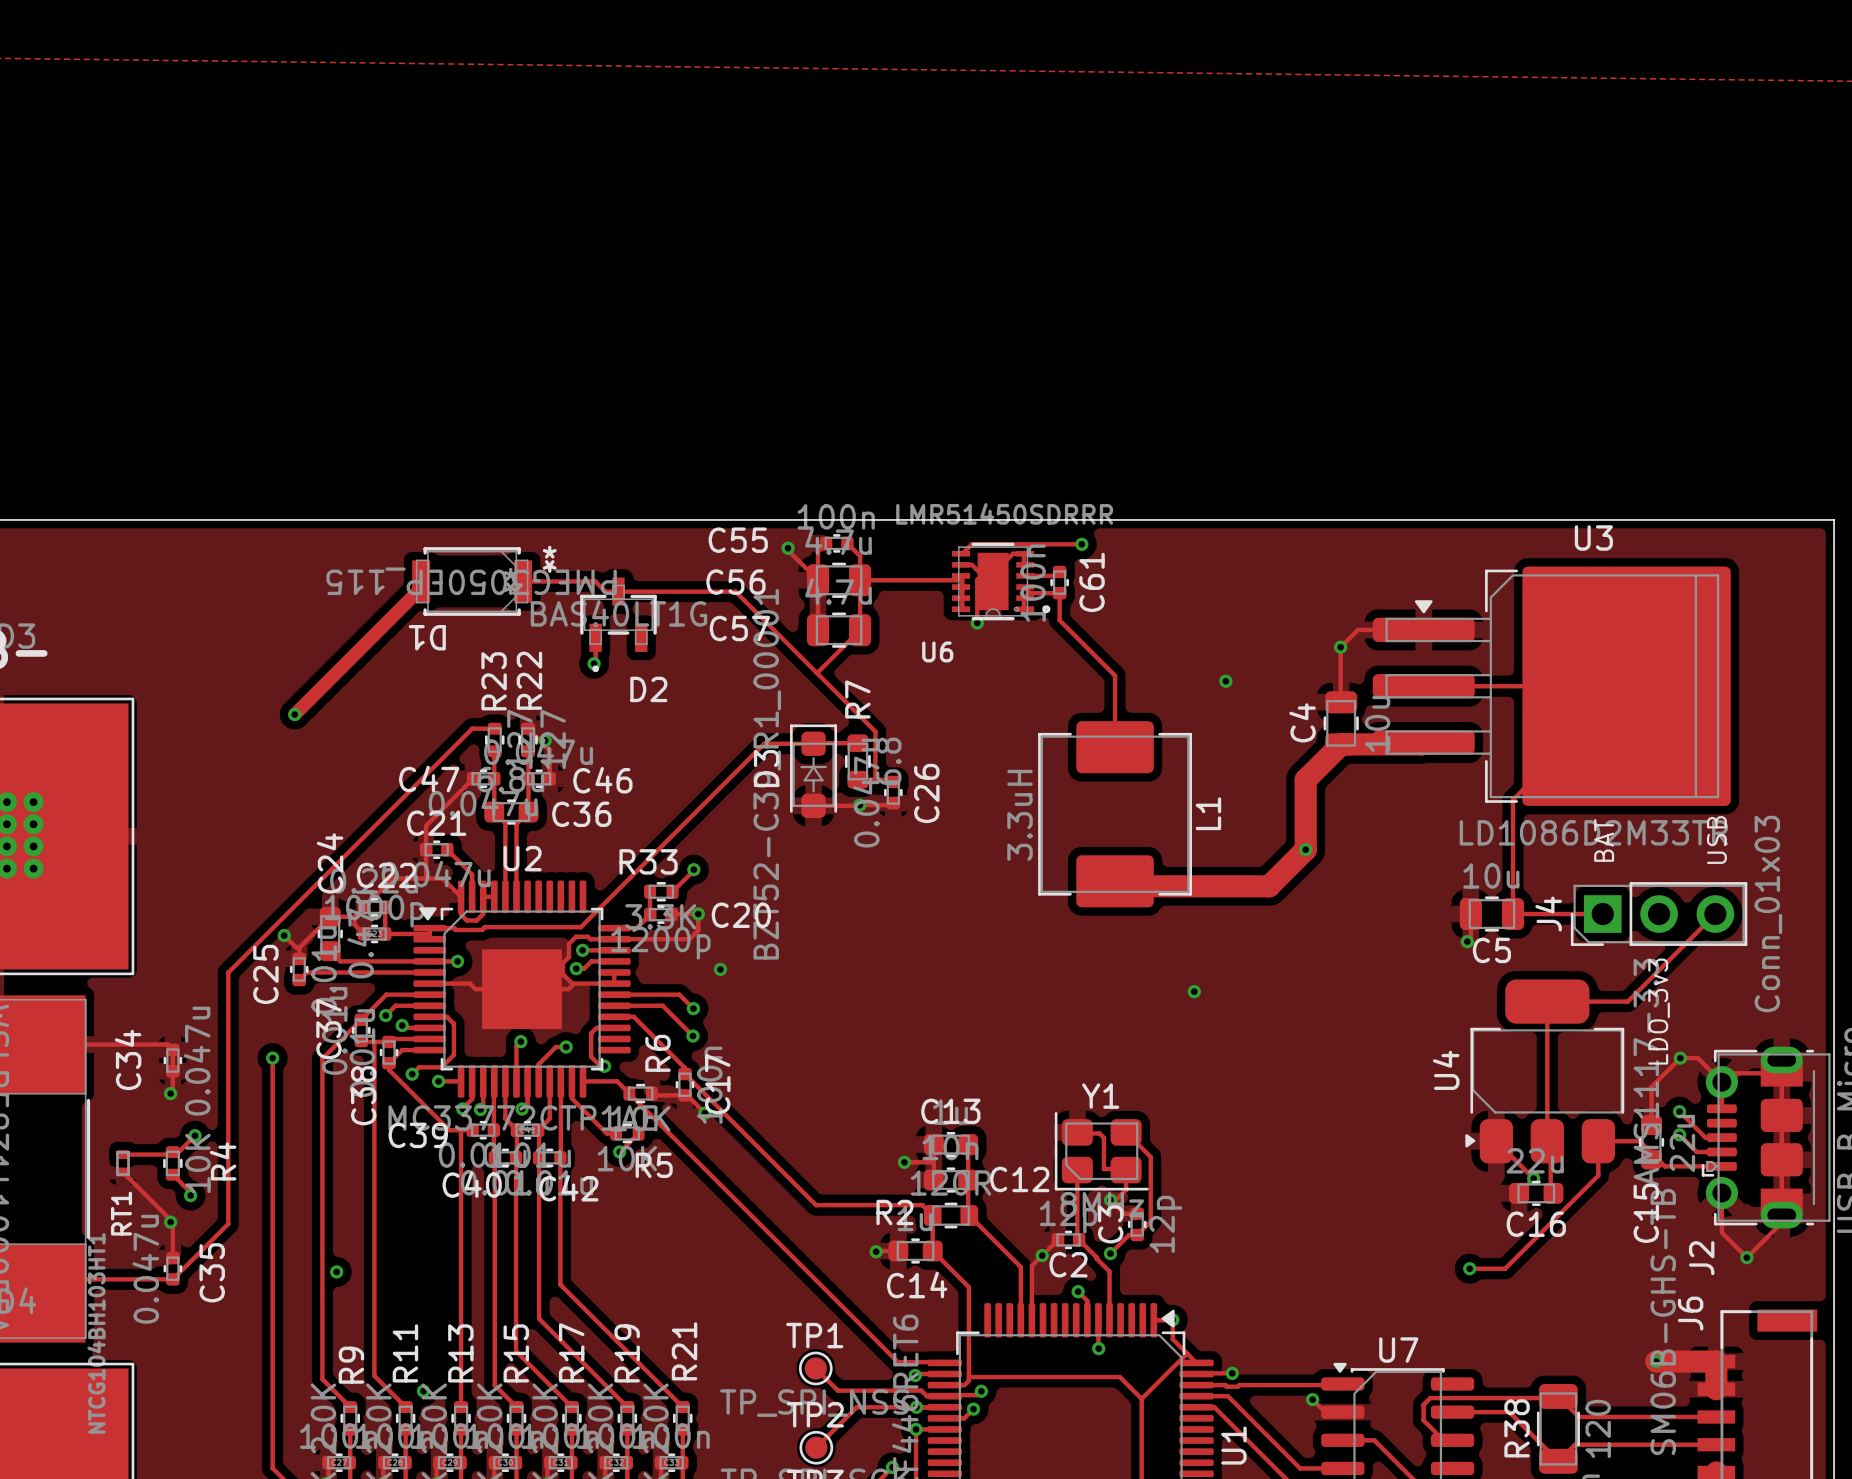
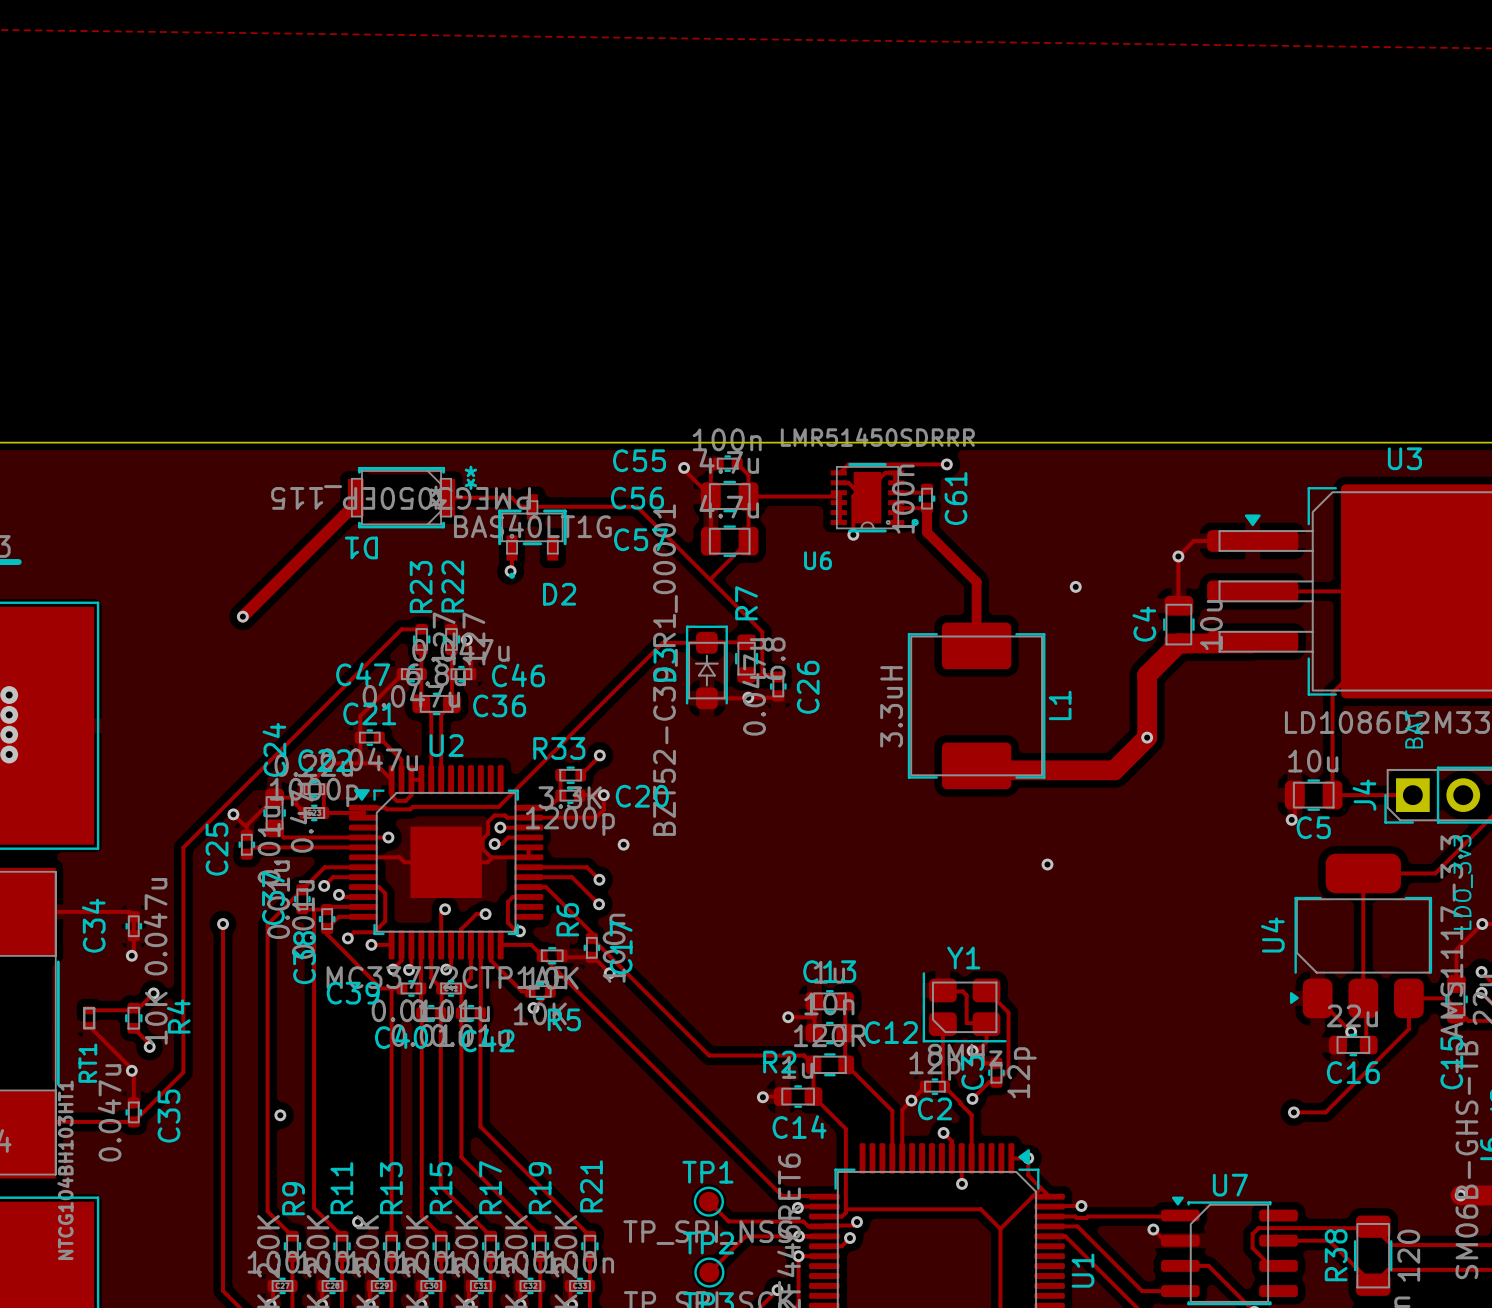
track width: thin (1059, 593) (1059, 620) (1115, 675) (1115, 747) -> thick (927, 508) (927, 532) (976, 581) (976, 645)

